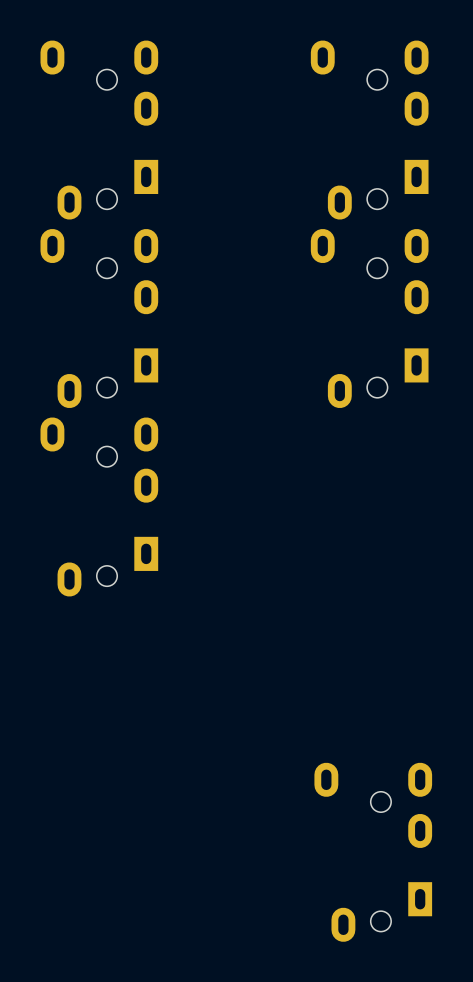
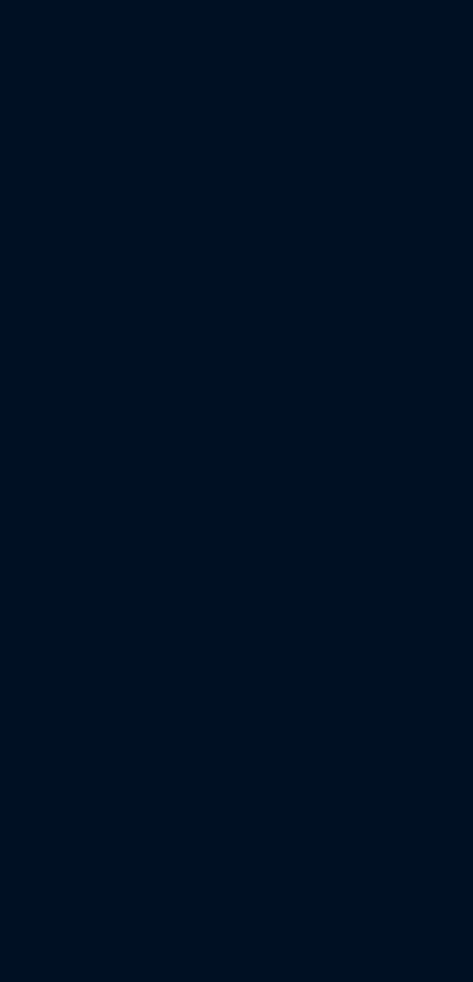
part: (99, 130) -> none
part: (369, 130) -> none
part: (99, 318) -> none
part: (369, 318) -> none
part: (99, 506) -> none
part: (373, 852) -> none

